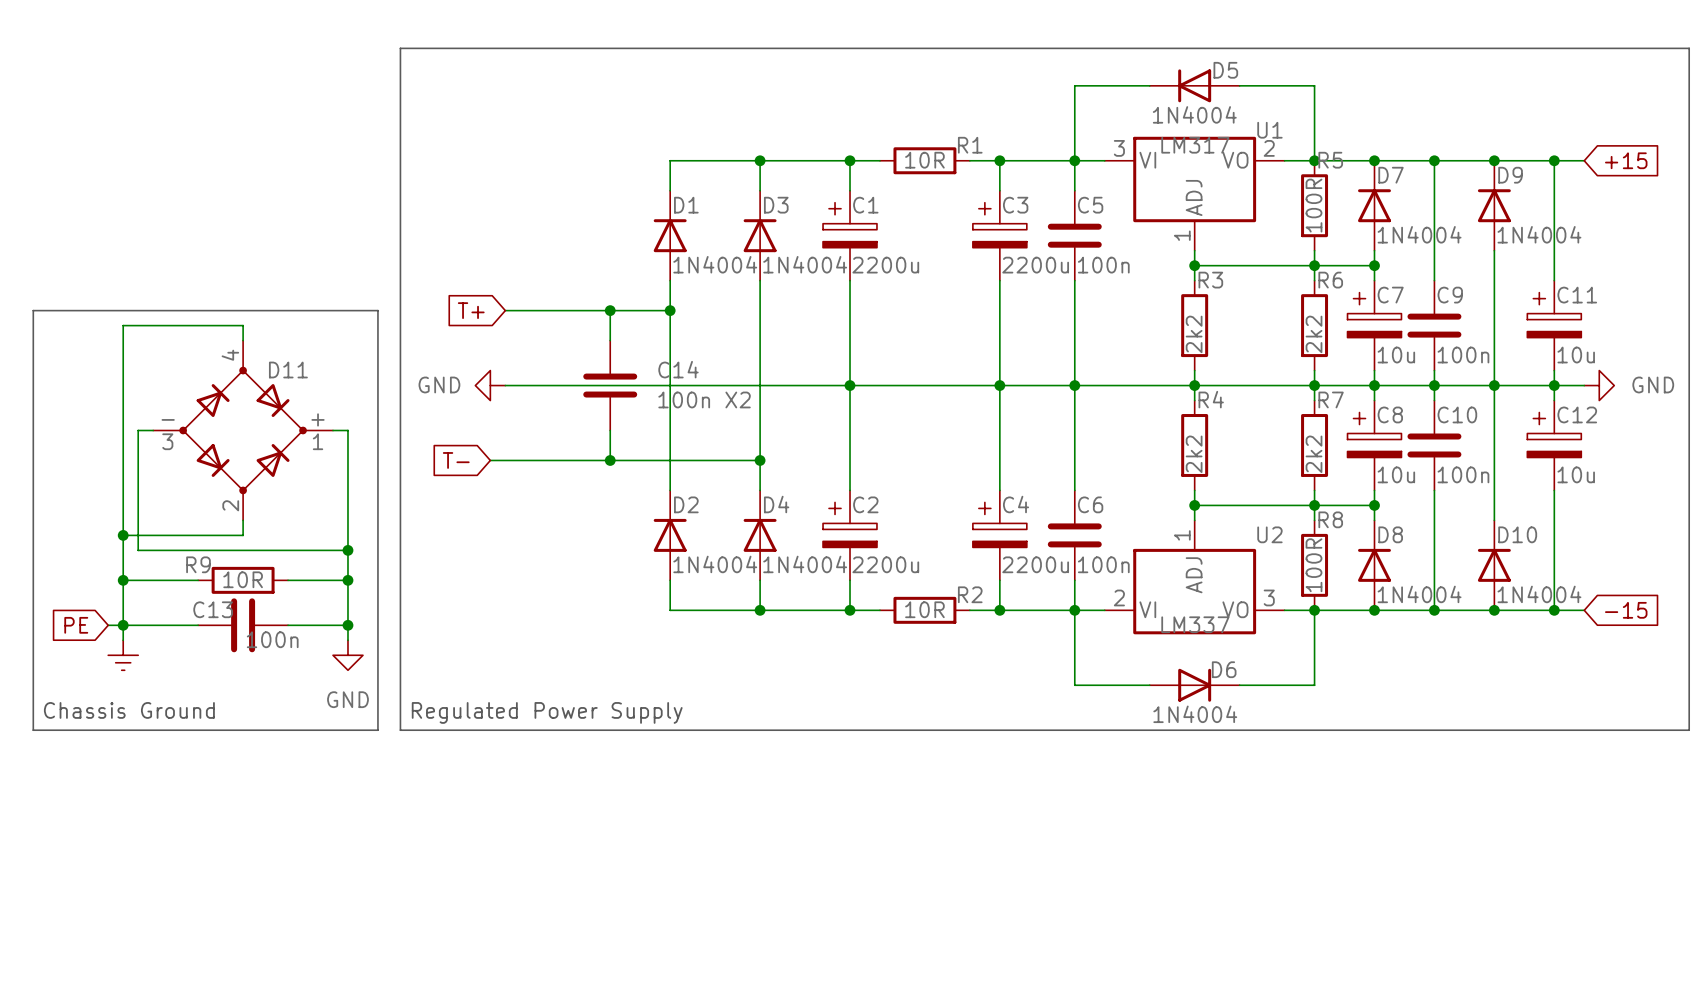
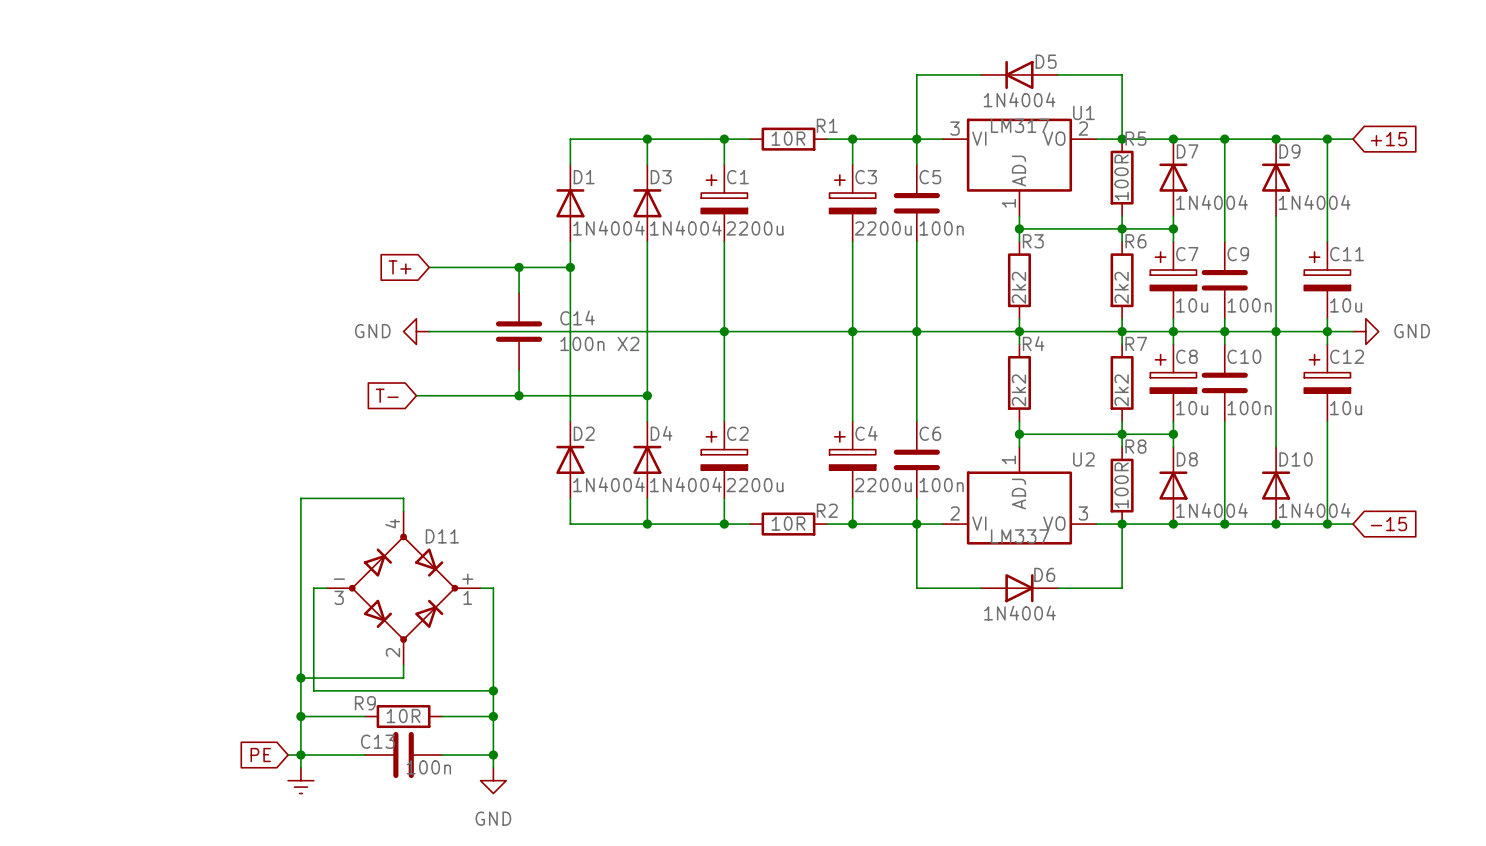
line: (400, 48) (1689, 48) (1689, 730) (400, 730) (400, 48) -> none
line: (33, 310) (377, 310) (377, 730) (33, 730) (33, 310) -> none
wire: (243, 340) (243, 325) (123, 325) (123, 640) -> none
wire: (153, 430) (138, 430) (138, 550) (347, 550) -> none
D11 position: (243, 430) -> (403, 588)
wire: (333, 430) (347, 430) (347, 640) -> none
wire: (243, 520) (243, 535) (123, 535) -> none
junction: (123, 535) -> none
junction: (347, 550) -> none
wire: (123, 580) (198, 580) -> none
junction: (123, 580) -> none
R9 position: (243, 580) -> (403, 716)
wire: (288, 580) (347, 580) -> none
junction: (347, 580) -> none
wire: none -> (403, 511) (403, 498) (300, 498) (300, 767)
global label: PE (76, 625) -> none
wire: (108, 625) (198, 625) -> none
junction: (123, 625) -> none
C13 position: (243, 625) -> (403, 755)
wire: (288, 625) (347, 625) -> none
junction: (347, 625) -> none
power symbol: (123, 655) -> none
power symbol: GND (347, 655) -> none
wire: none -> (326, 588) (313, 588) (313, 690) (493, 690)
wire: none -> (480, 588) (493, 588) (493, 767)
text: Chassis Ground (129, 710) -> none
text: Regulated Power Supply (547, 712) -> none
wire: none -> (403, 665) (403, 678) (300, 678)
junction: none -> (300, 678)
junction: none -> (493, 690)
wire: none -> (300, 716) (365, 716)
junction: none -> (300, 716)
wire: none -> (442, 716) (493, 716)
junction: none -> (493, 716)
global label: none -> PE (260, 755)
wire: none -> (288, 755) (365, 755)
junction: none -> (300, 755)
wire: none -> (442, 755) (493, 755)
junction: none -> (493, 755)
power symbol: none -> (300, 780)
power symbol: none -> GND (493, 780)

